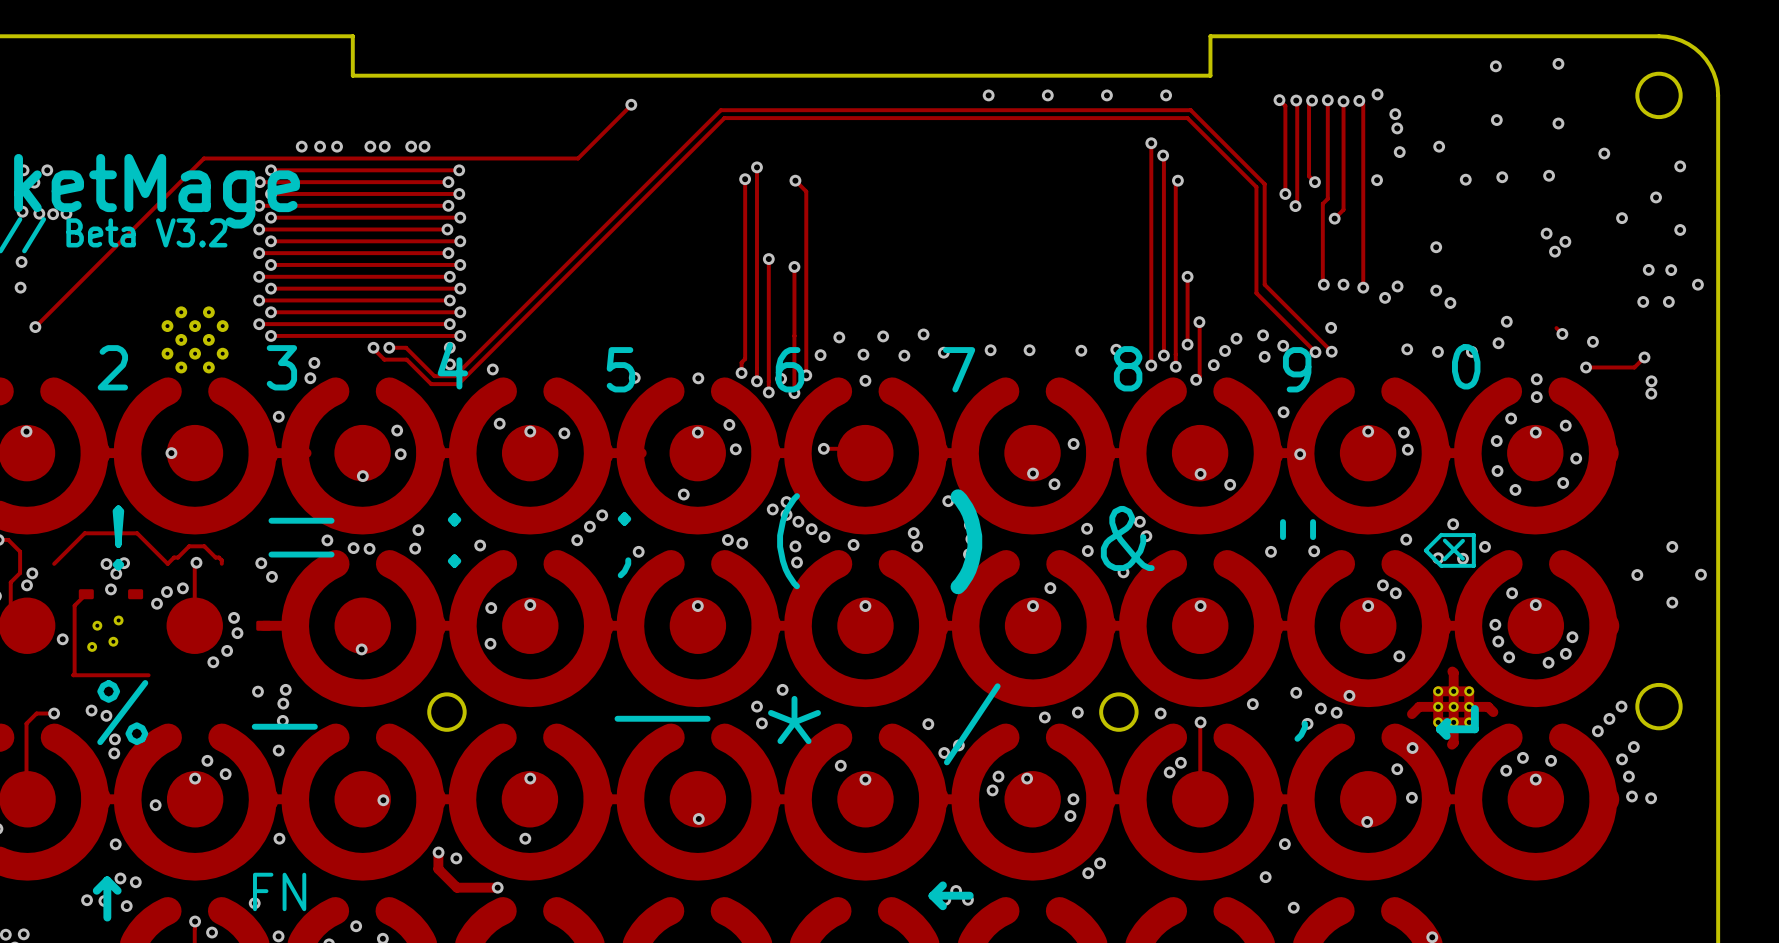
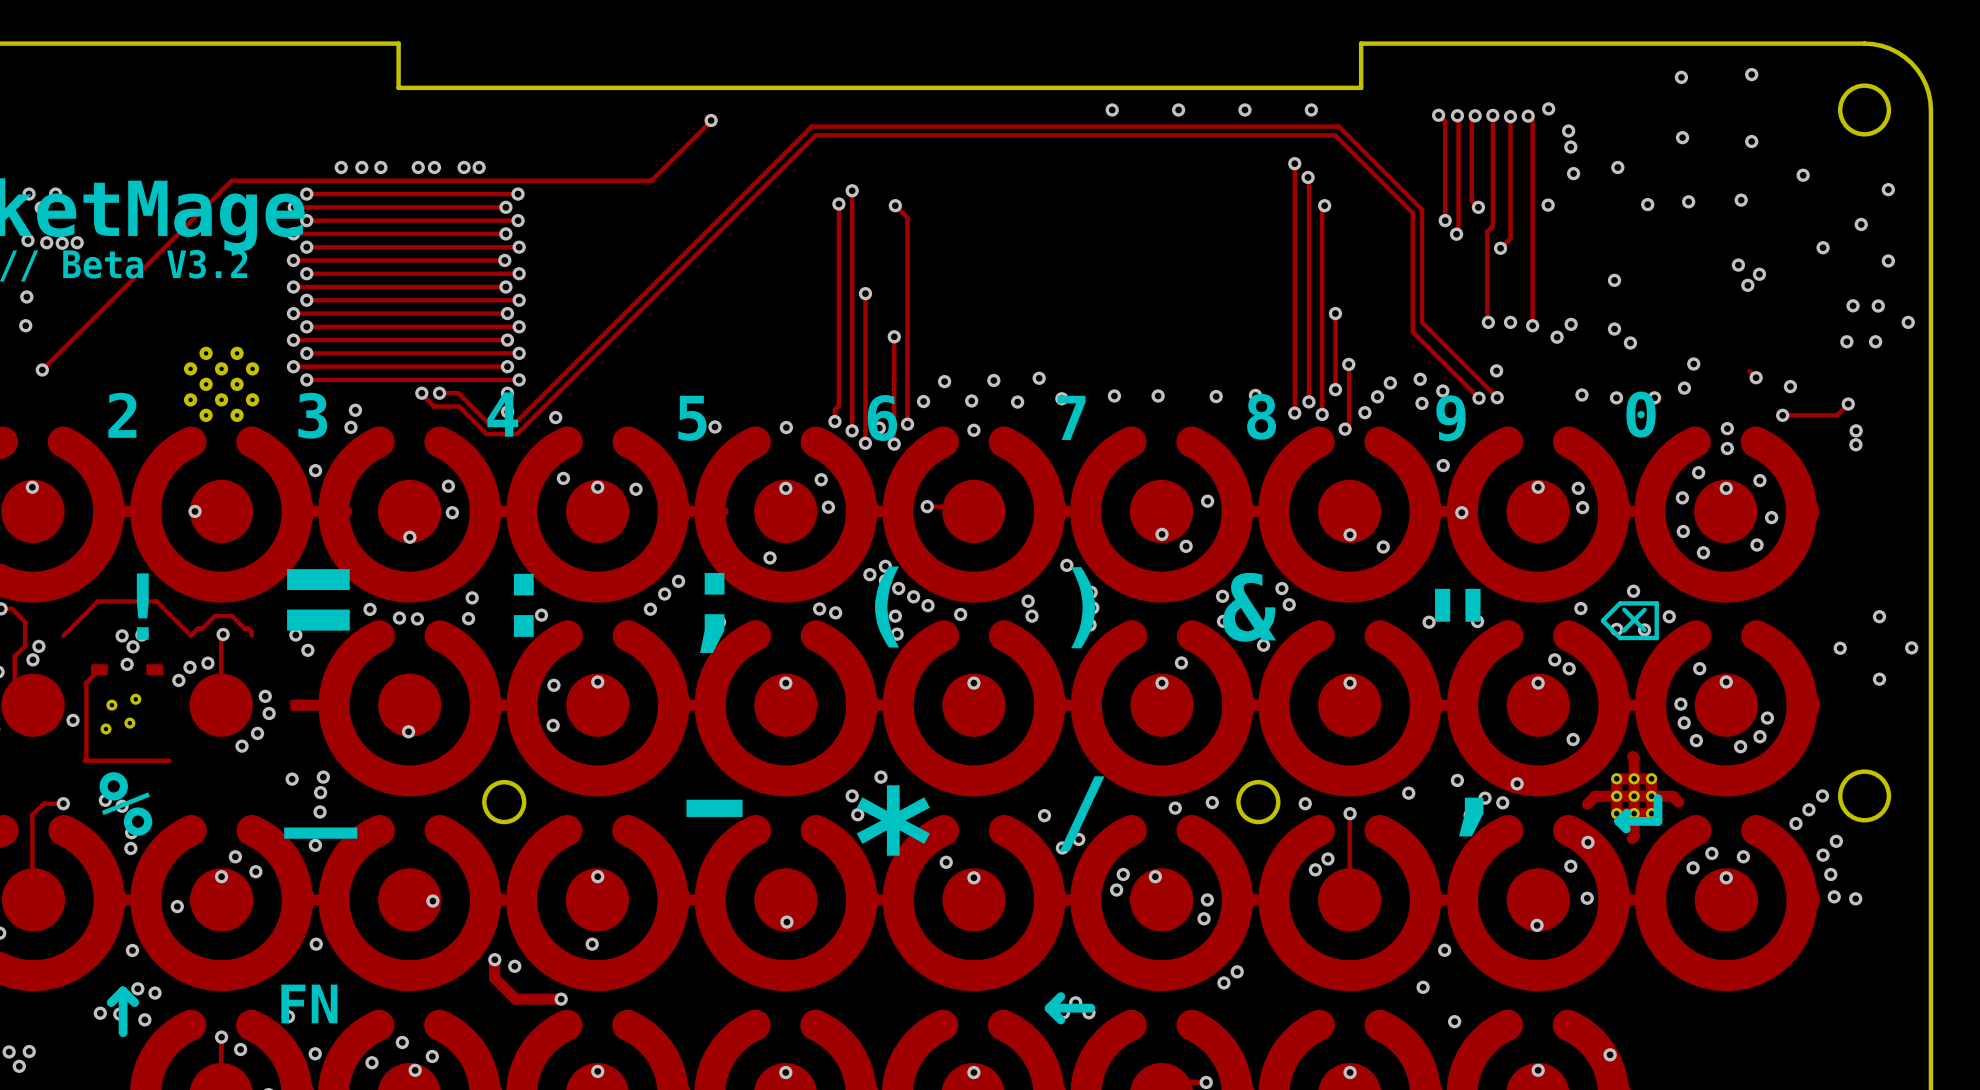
track: (794, 266) (794, 297) -> none
via position: (794, 266) -> (894, 336)

